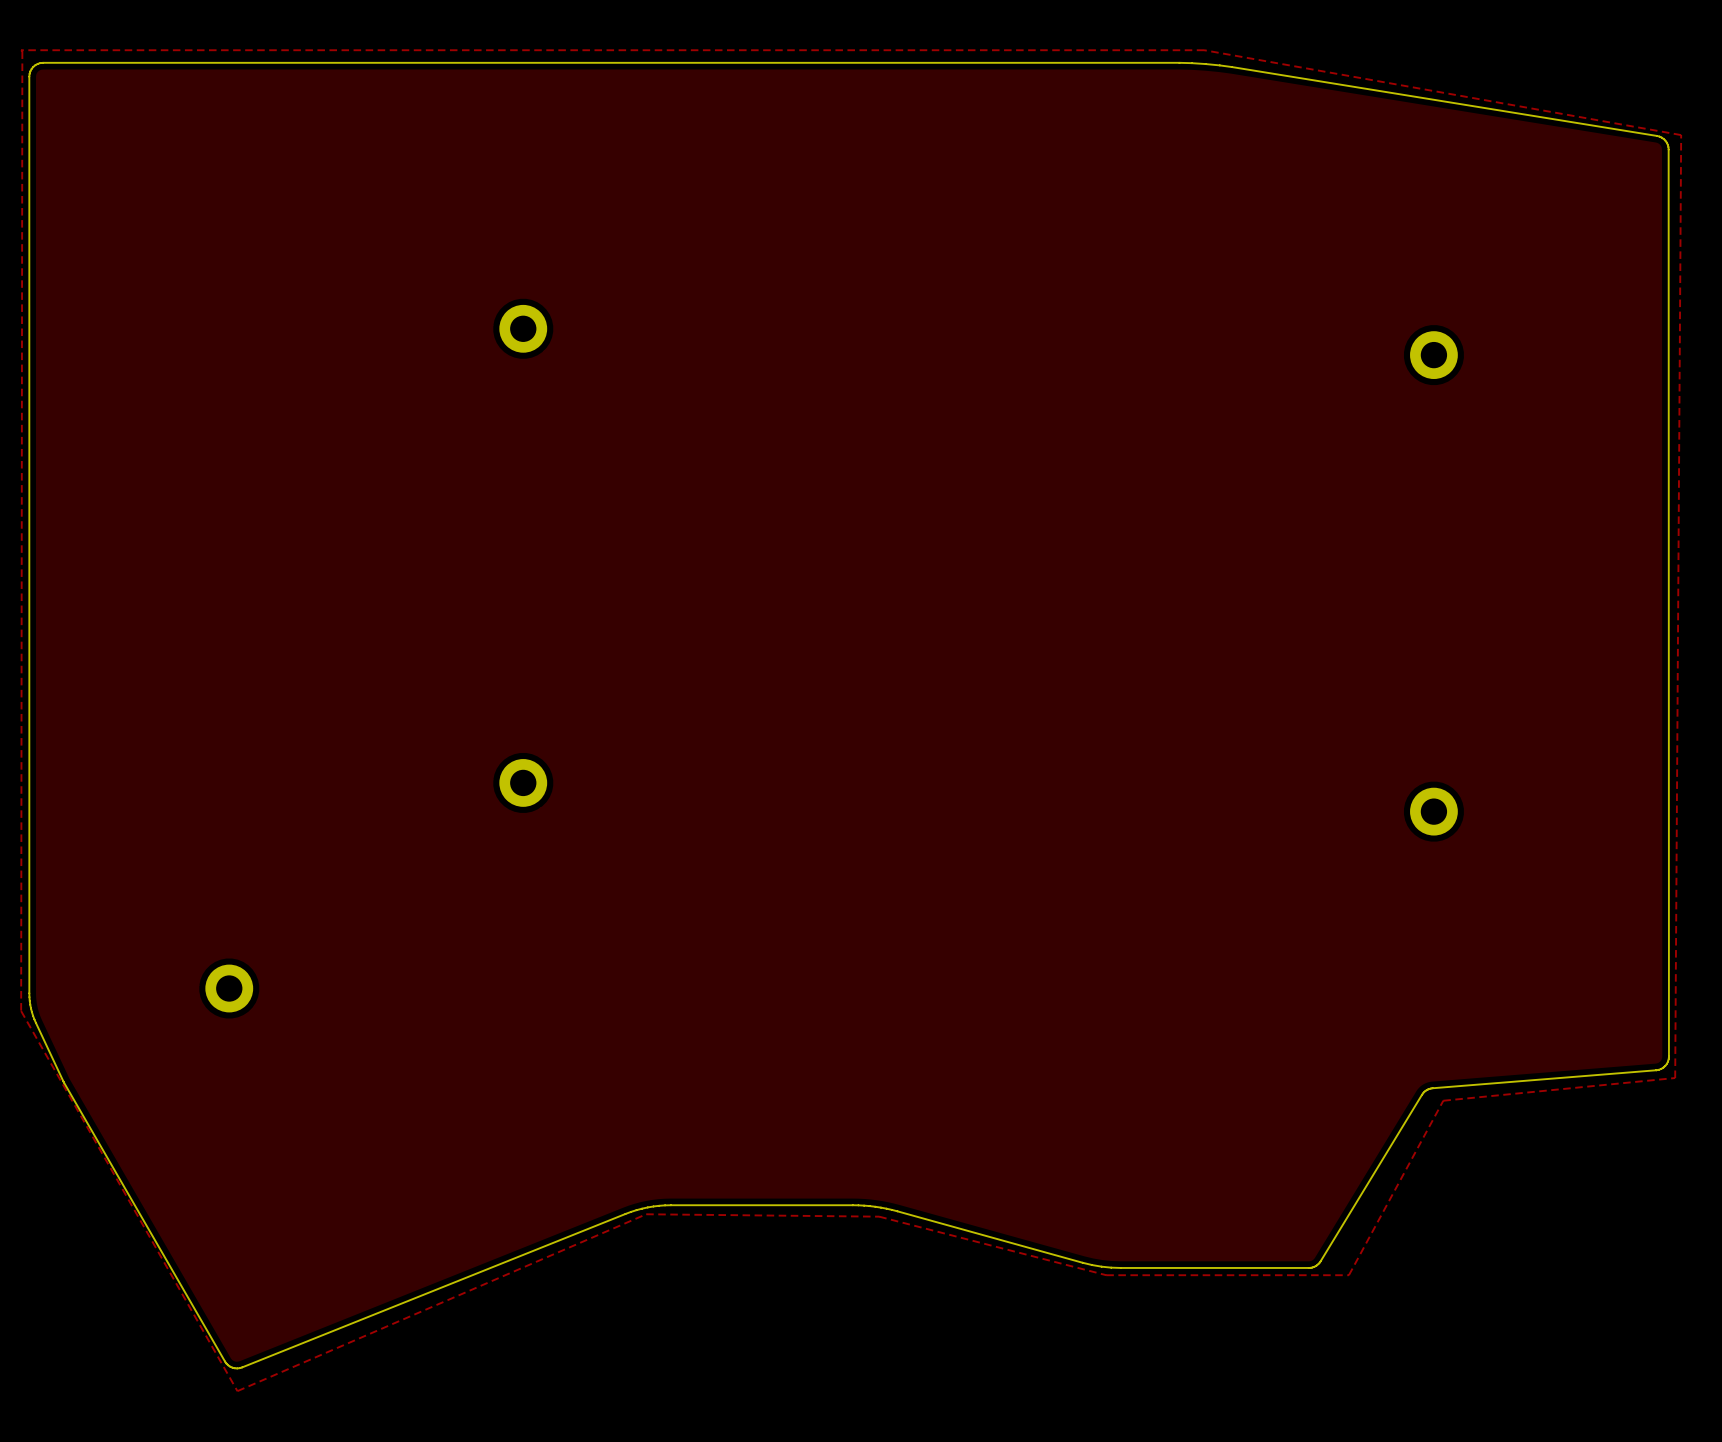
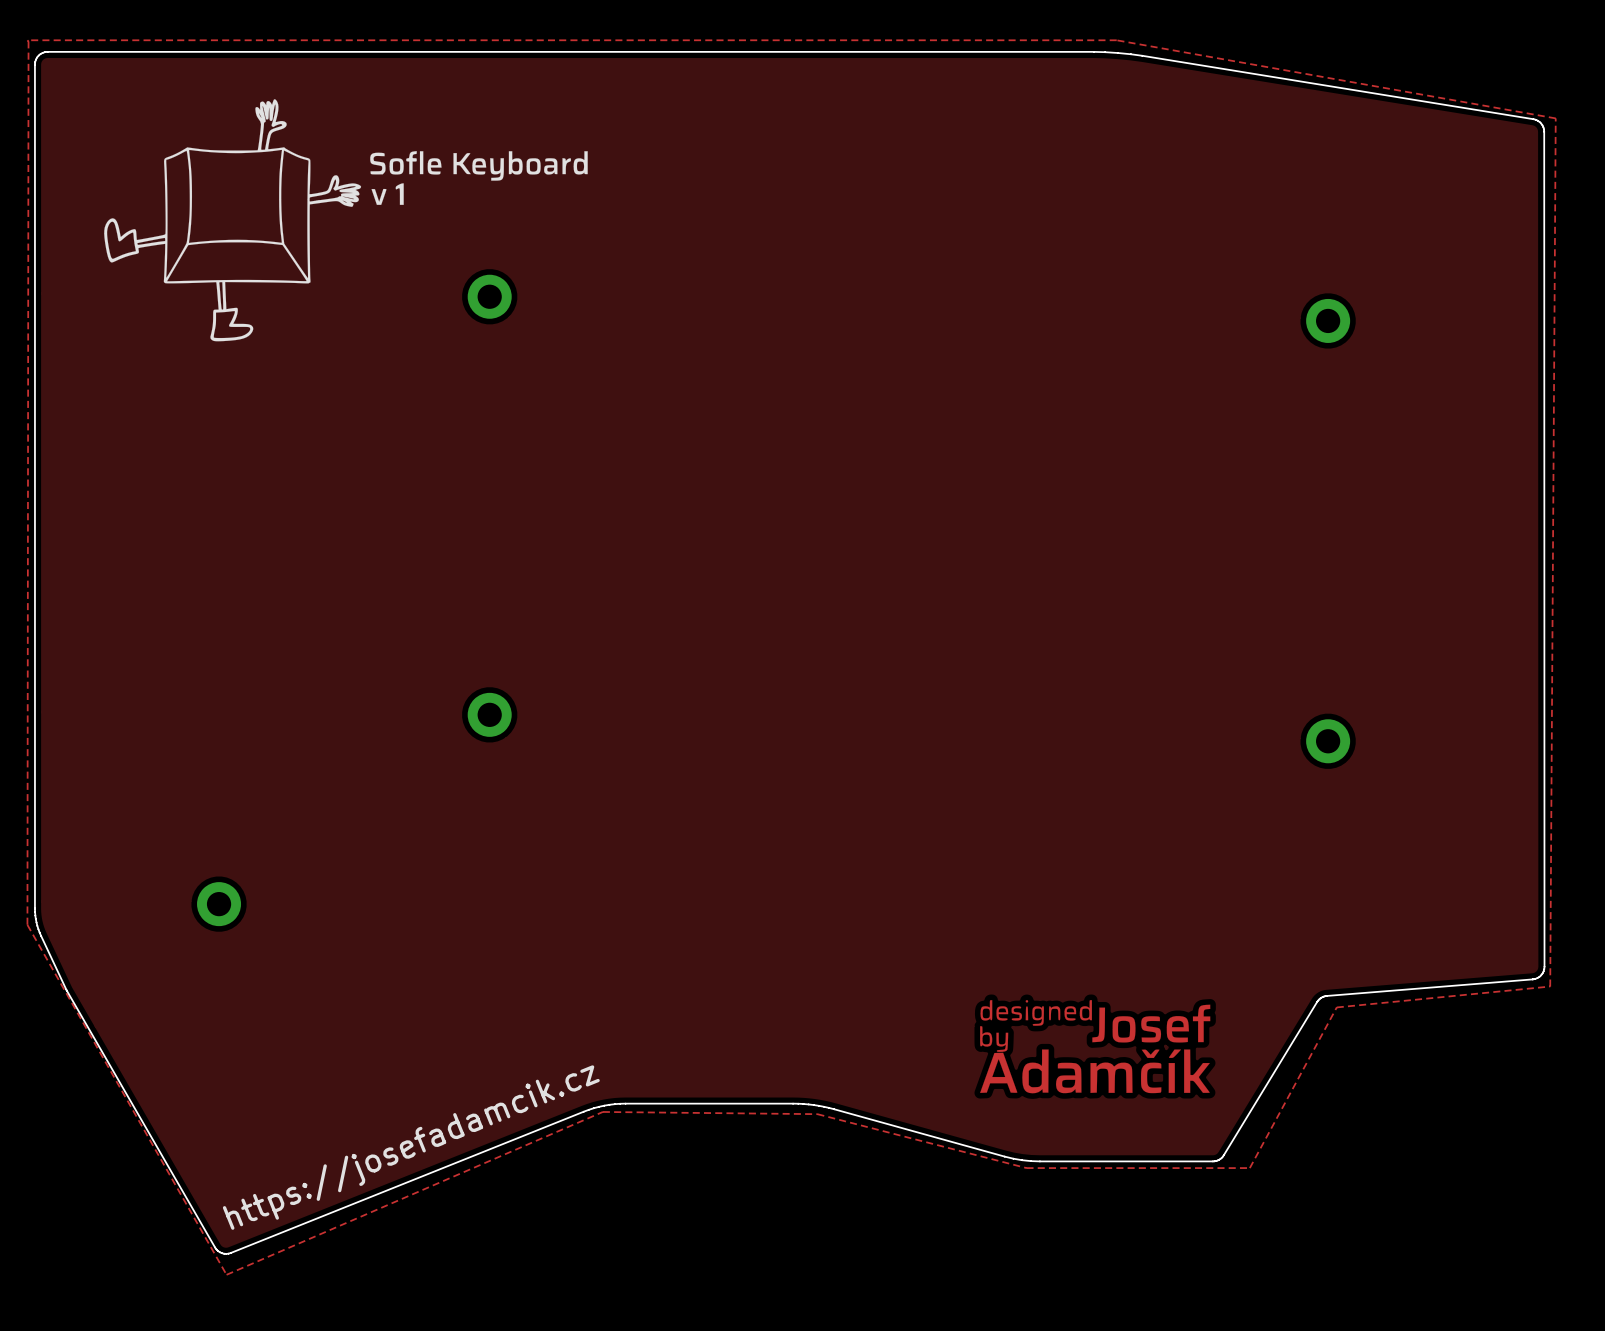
drawing: none -> [104, 99, 588, 342]
drawing: none -> [980, 1000, 1211, 1094]
text: none -> https://josefadamcik.cz (411, 1147)

